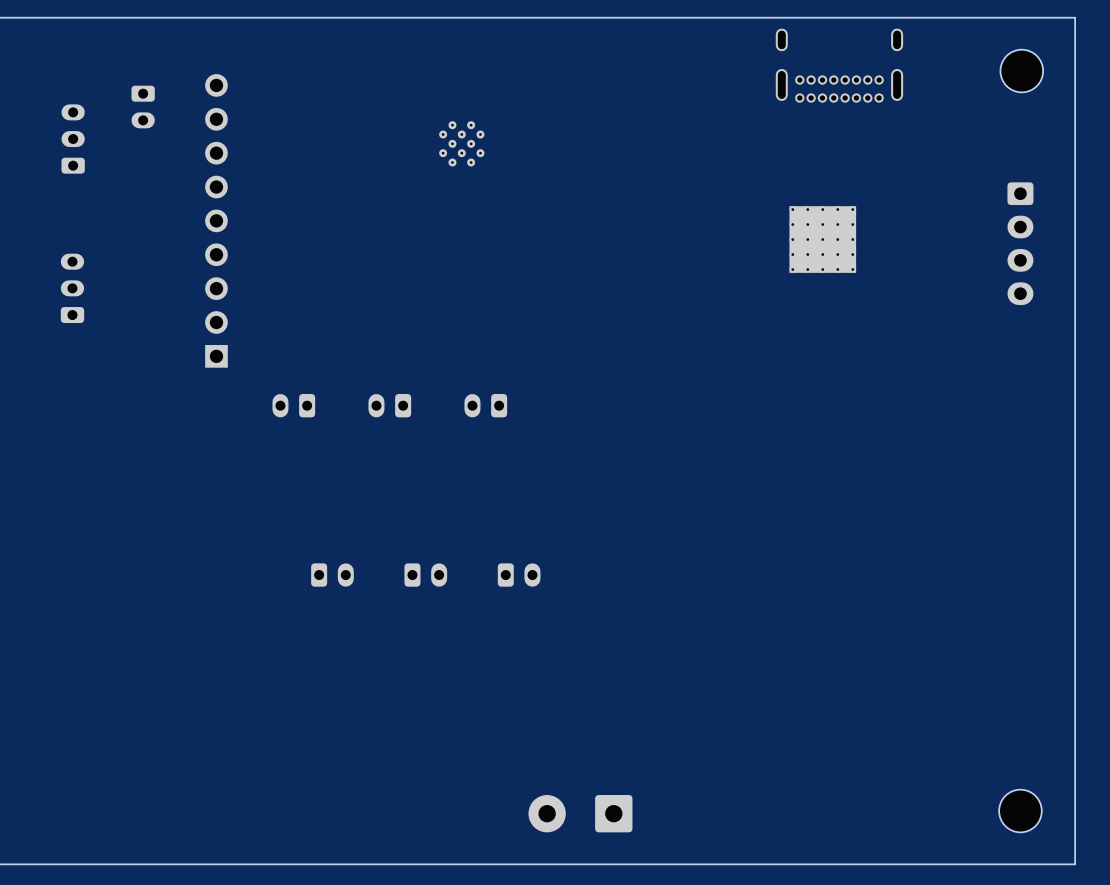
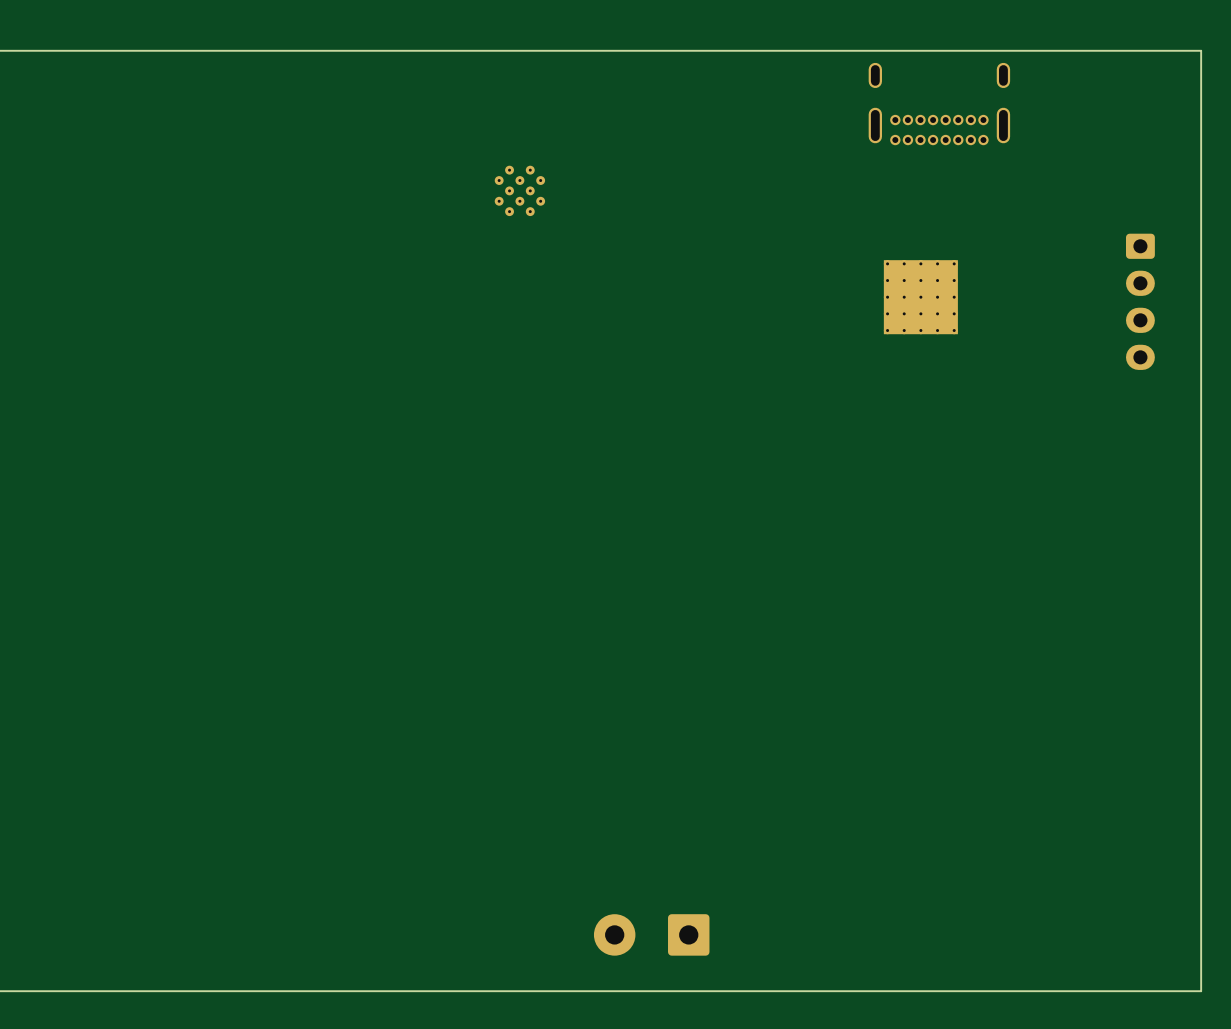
part: (1021, 71) -> none
part: (143, 107) -> none
part: (73, 139) -> none
part: (216, 220) -> none
part: (72, 288) -> none
part: (293, 405) -> none
part: (389, 405) -> none
part: (485, 405) -> none
part: (332, 575) -> none
part: (425, 575) -> none
part: (519, 575) -> none
part: (1020, 811) -> none

